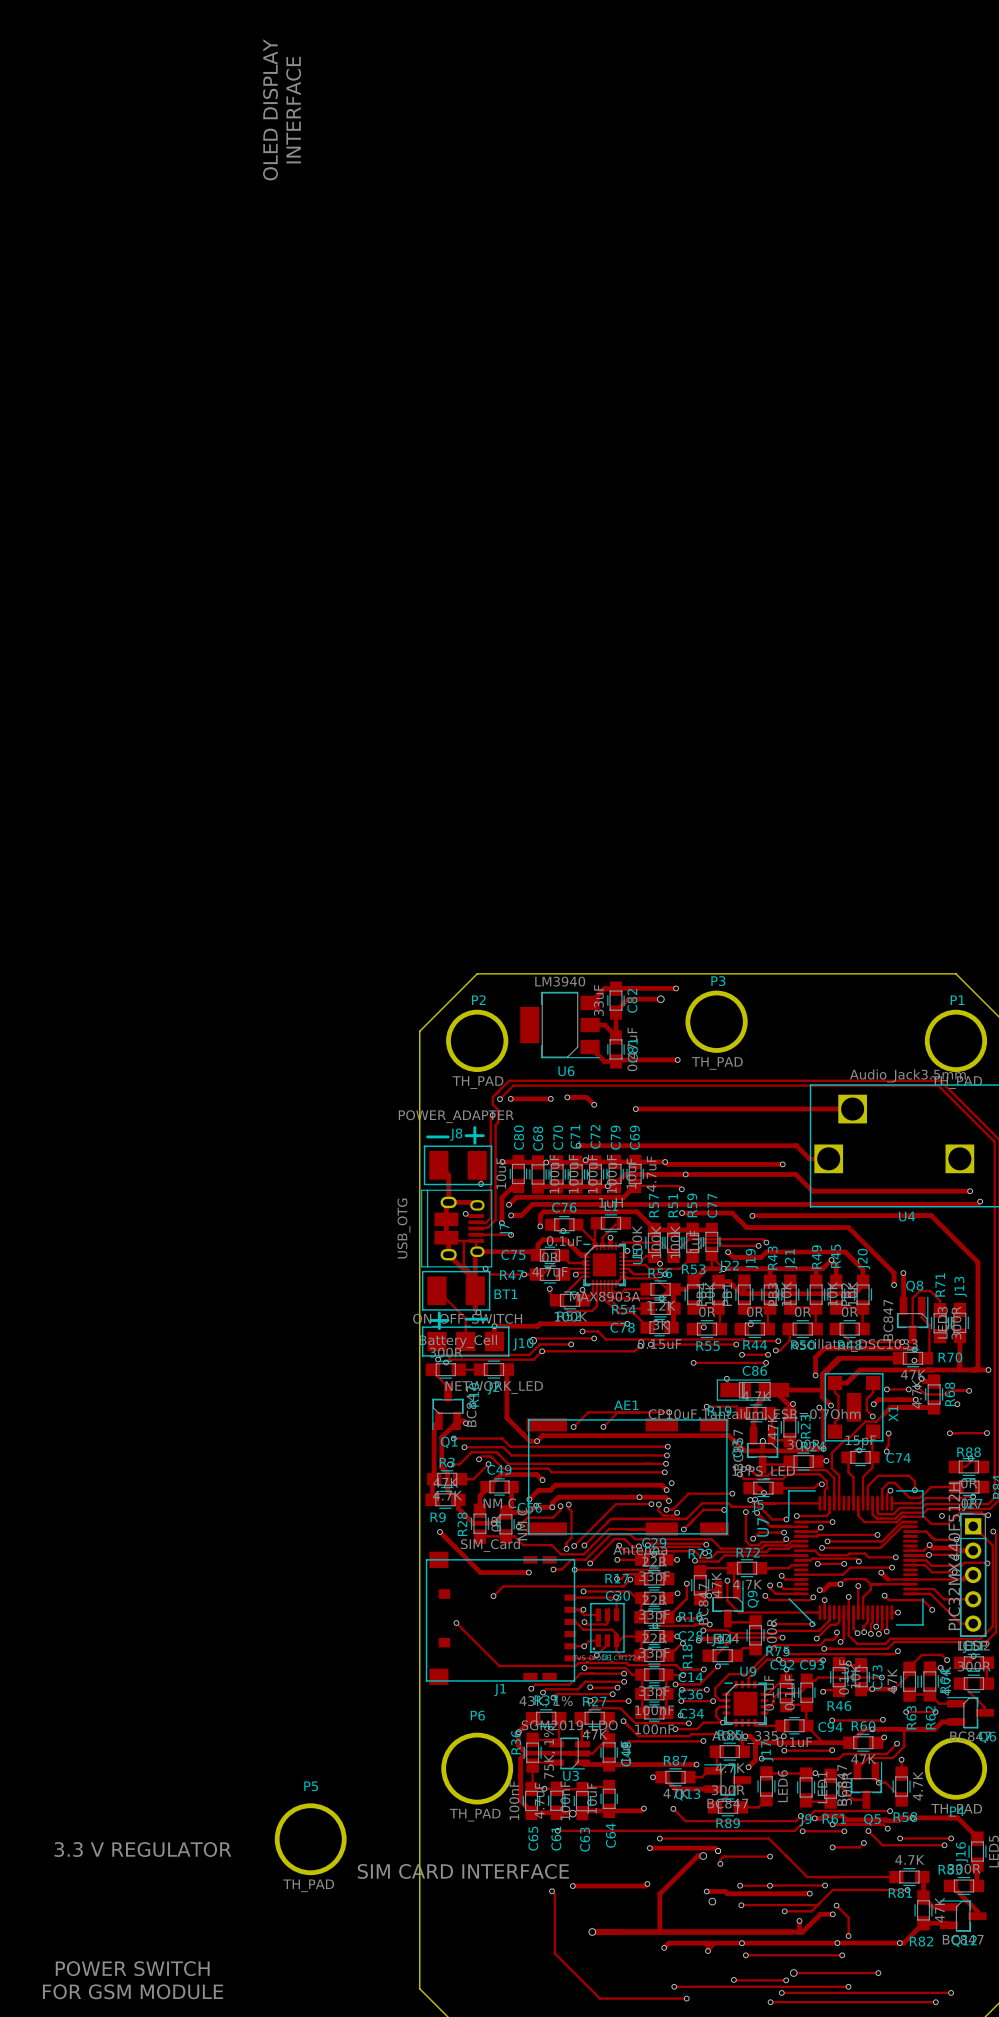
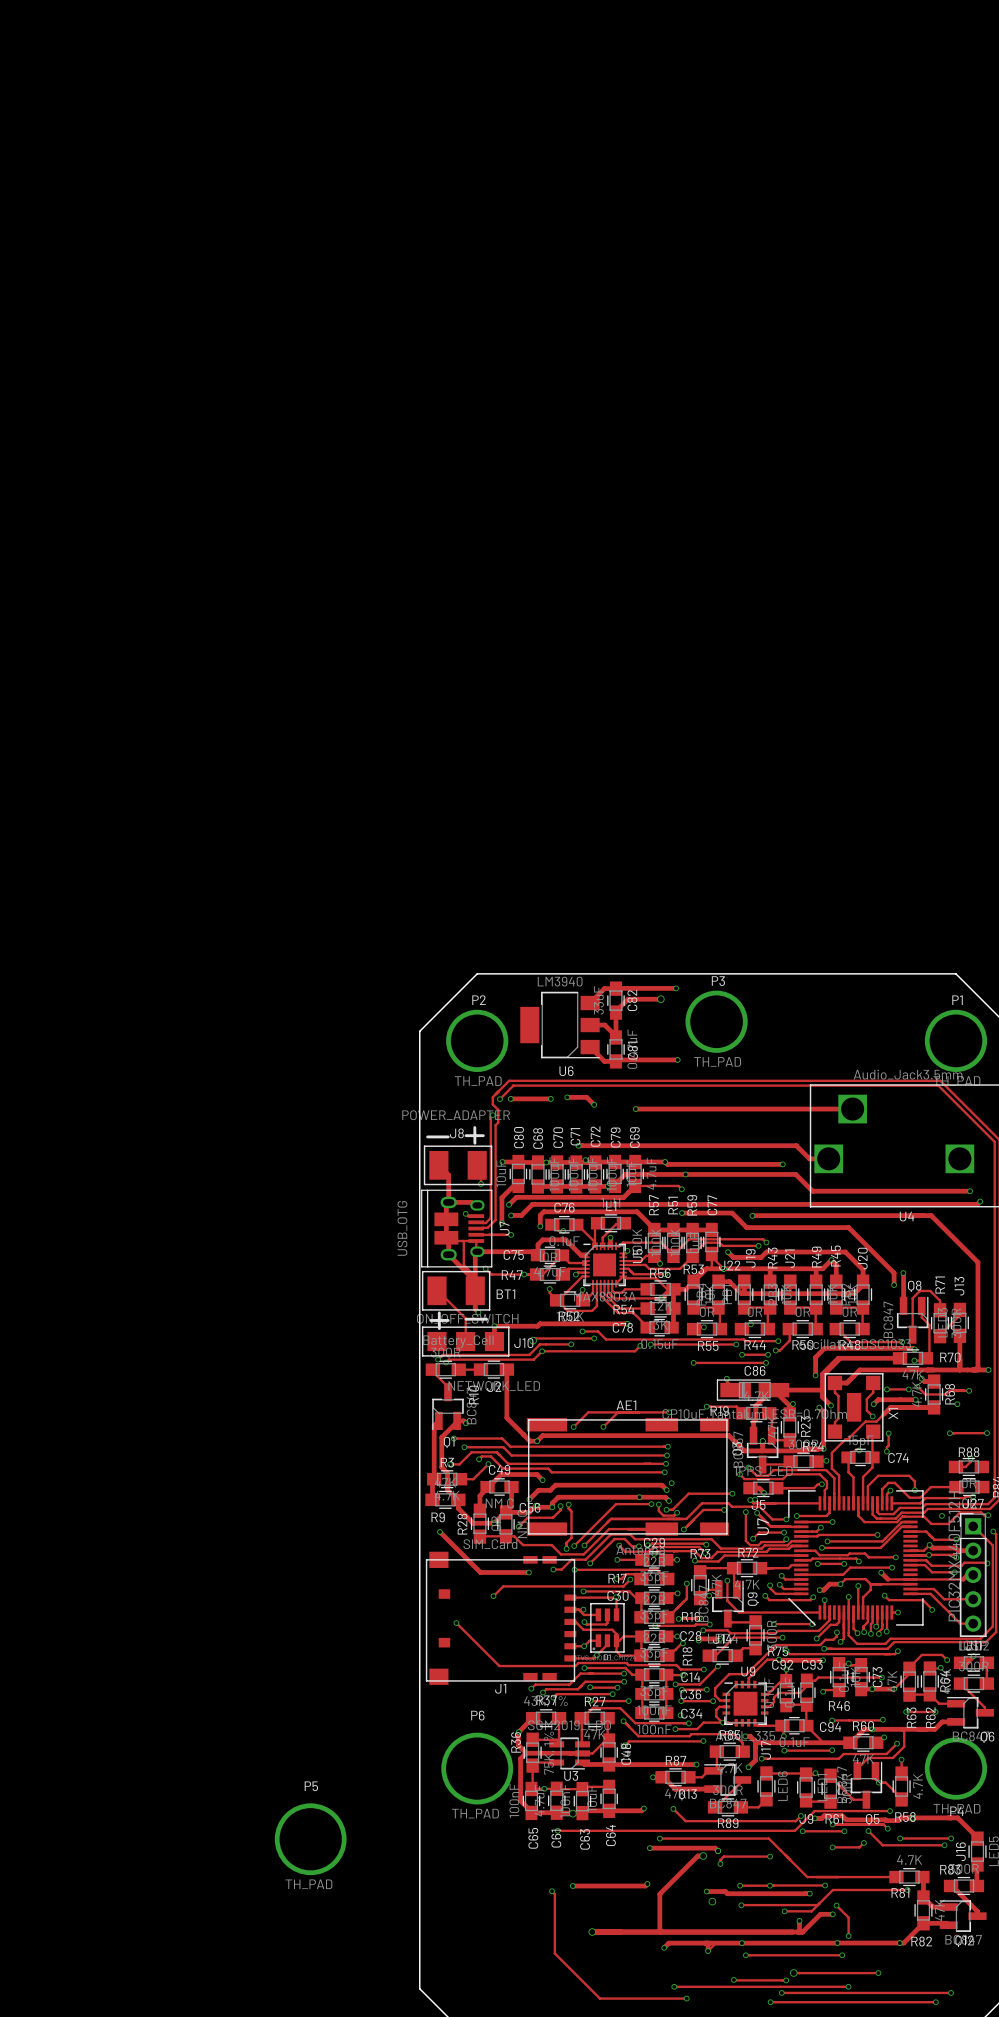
text: OLED DISPLAY (270, 109) -> none
text: INTERFACE (293, 110) -> none
text: 3.3 V REGULATOR (142, 1849) -> none
text: SIM CARD INTERFACE (463, 1871) -> none
text: POWER SWITCH (132, 1968) -> none
text: FOR GSM MODULE (133, 1991) -> none

